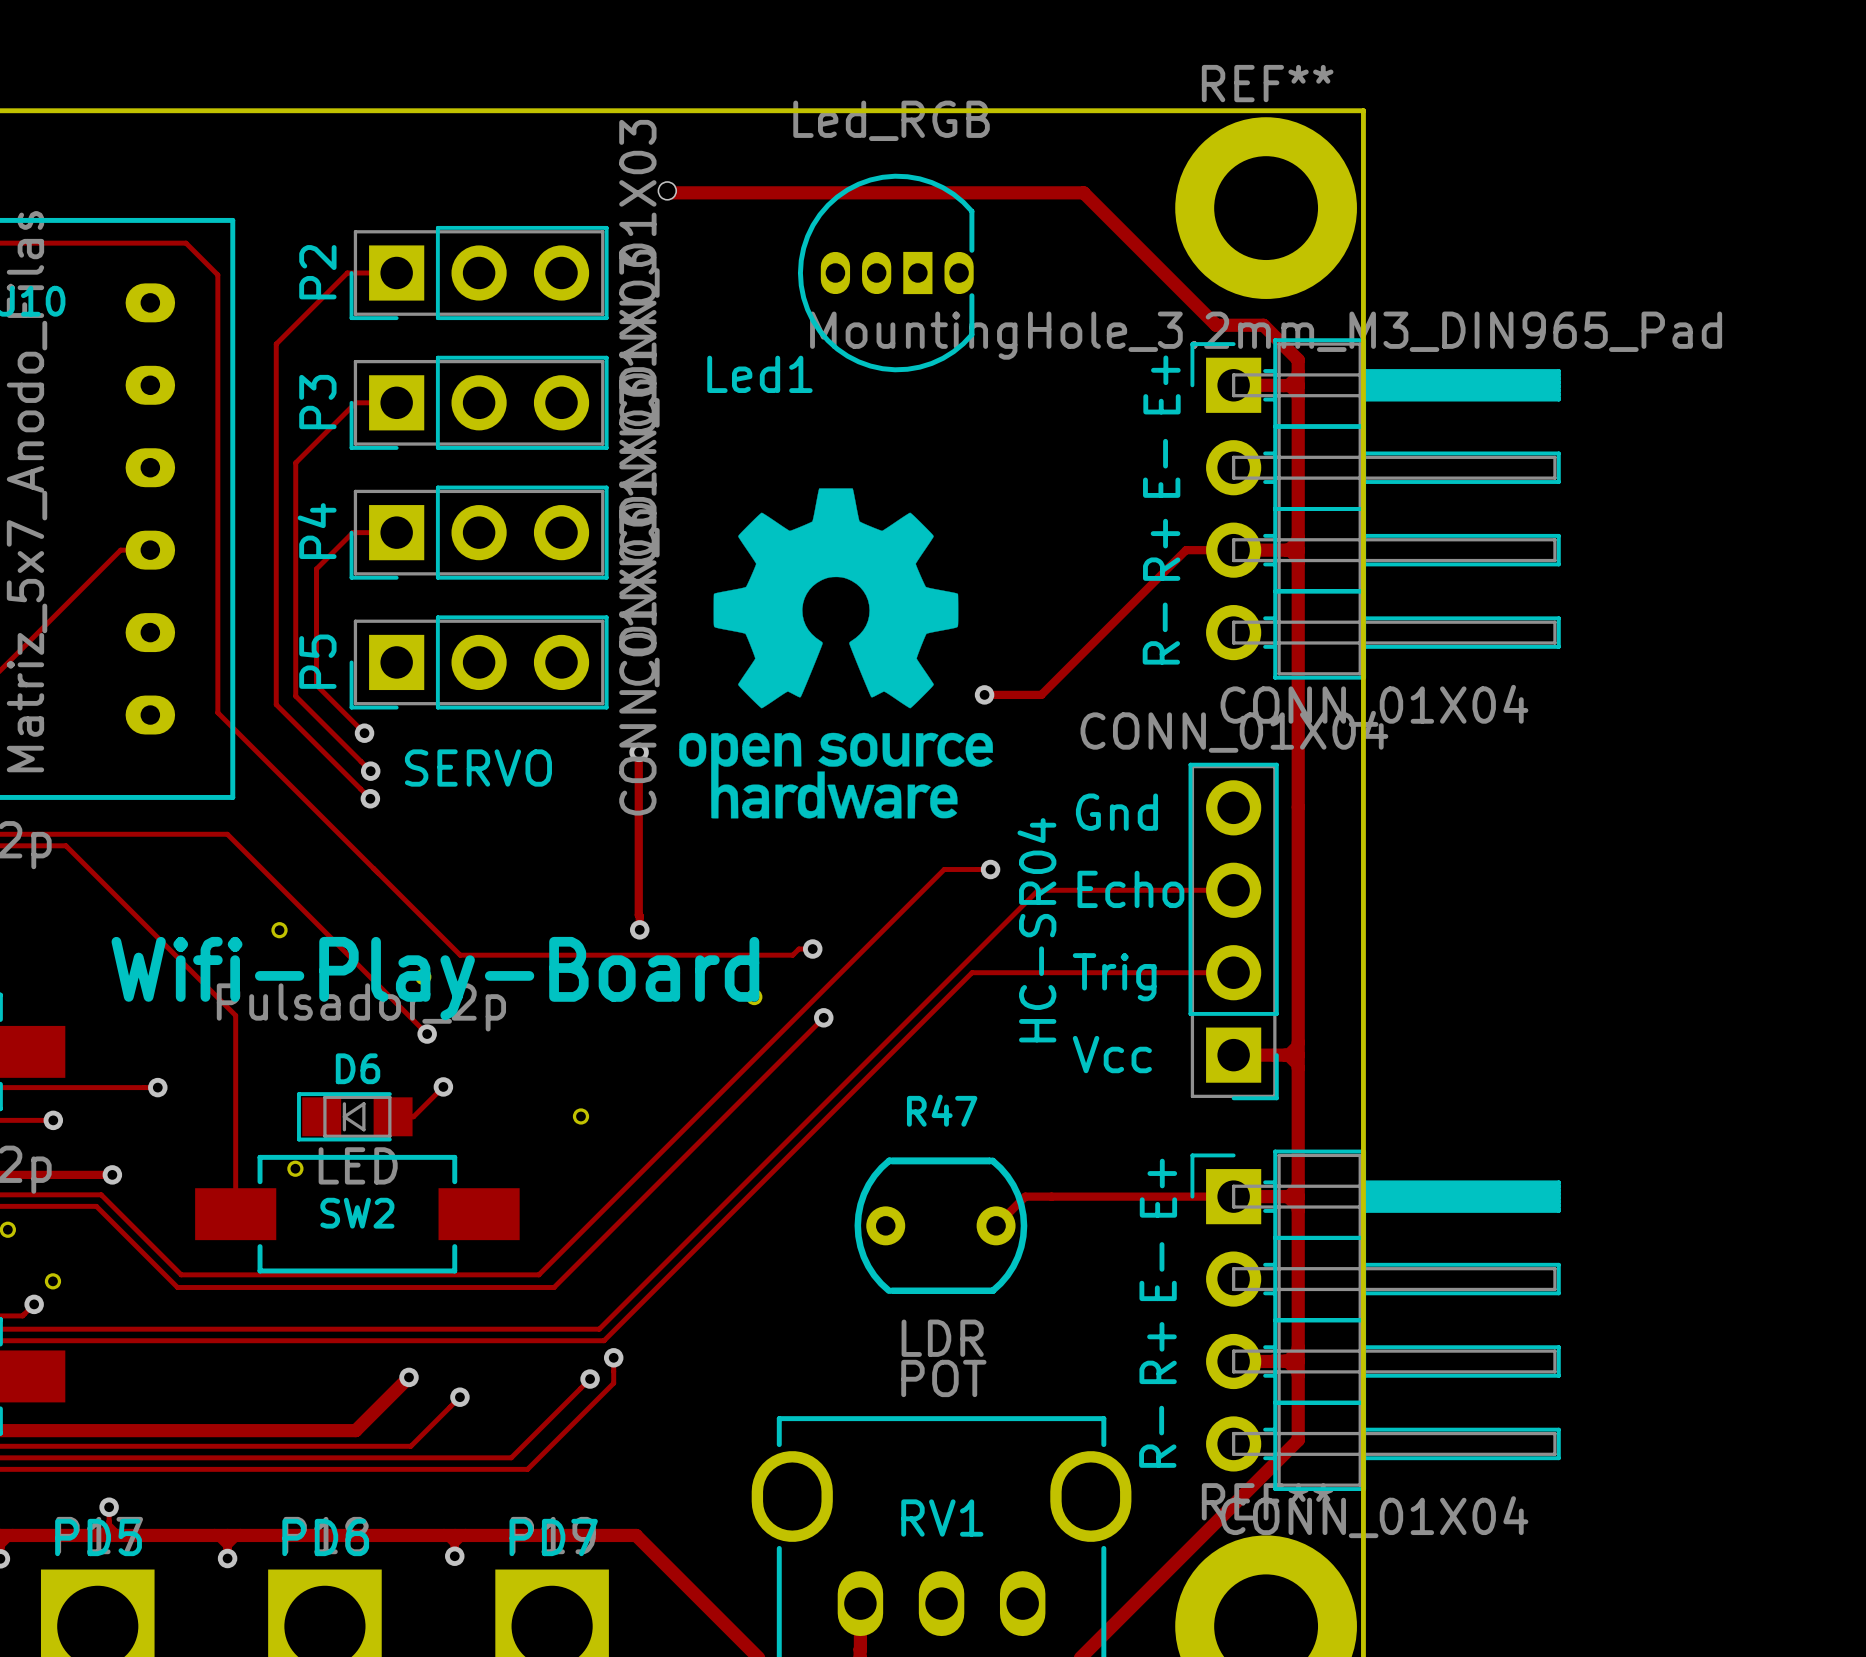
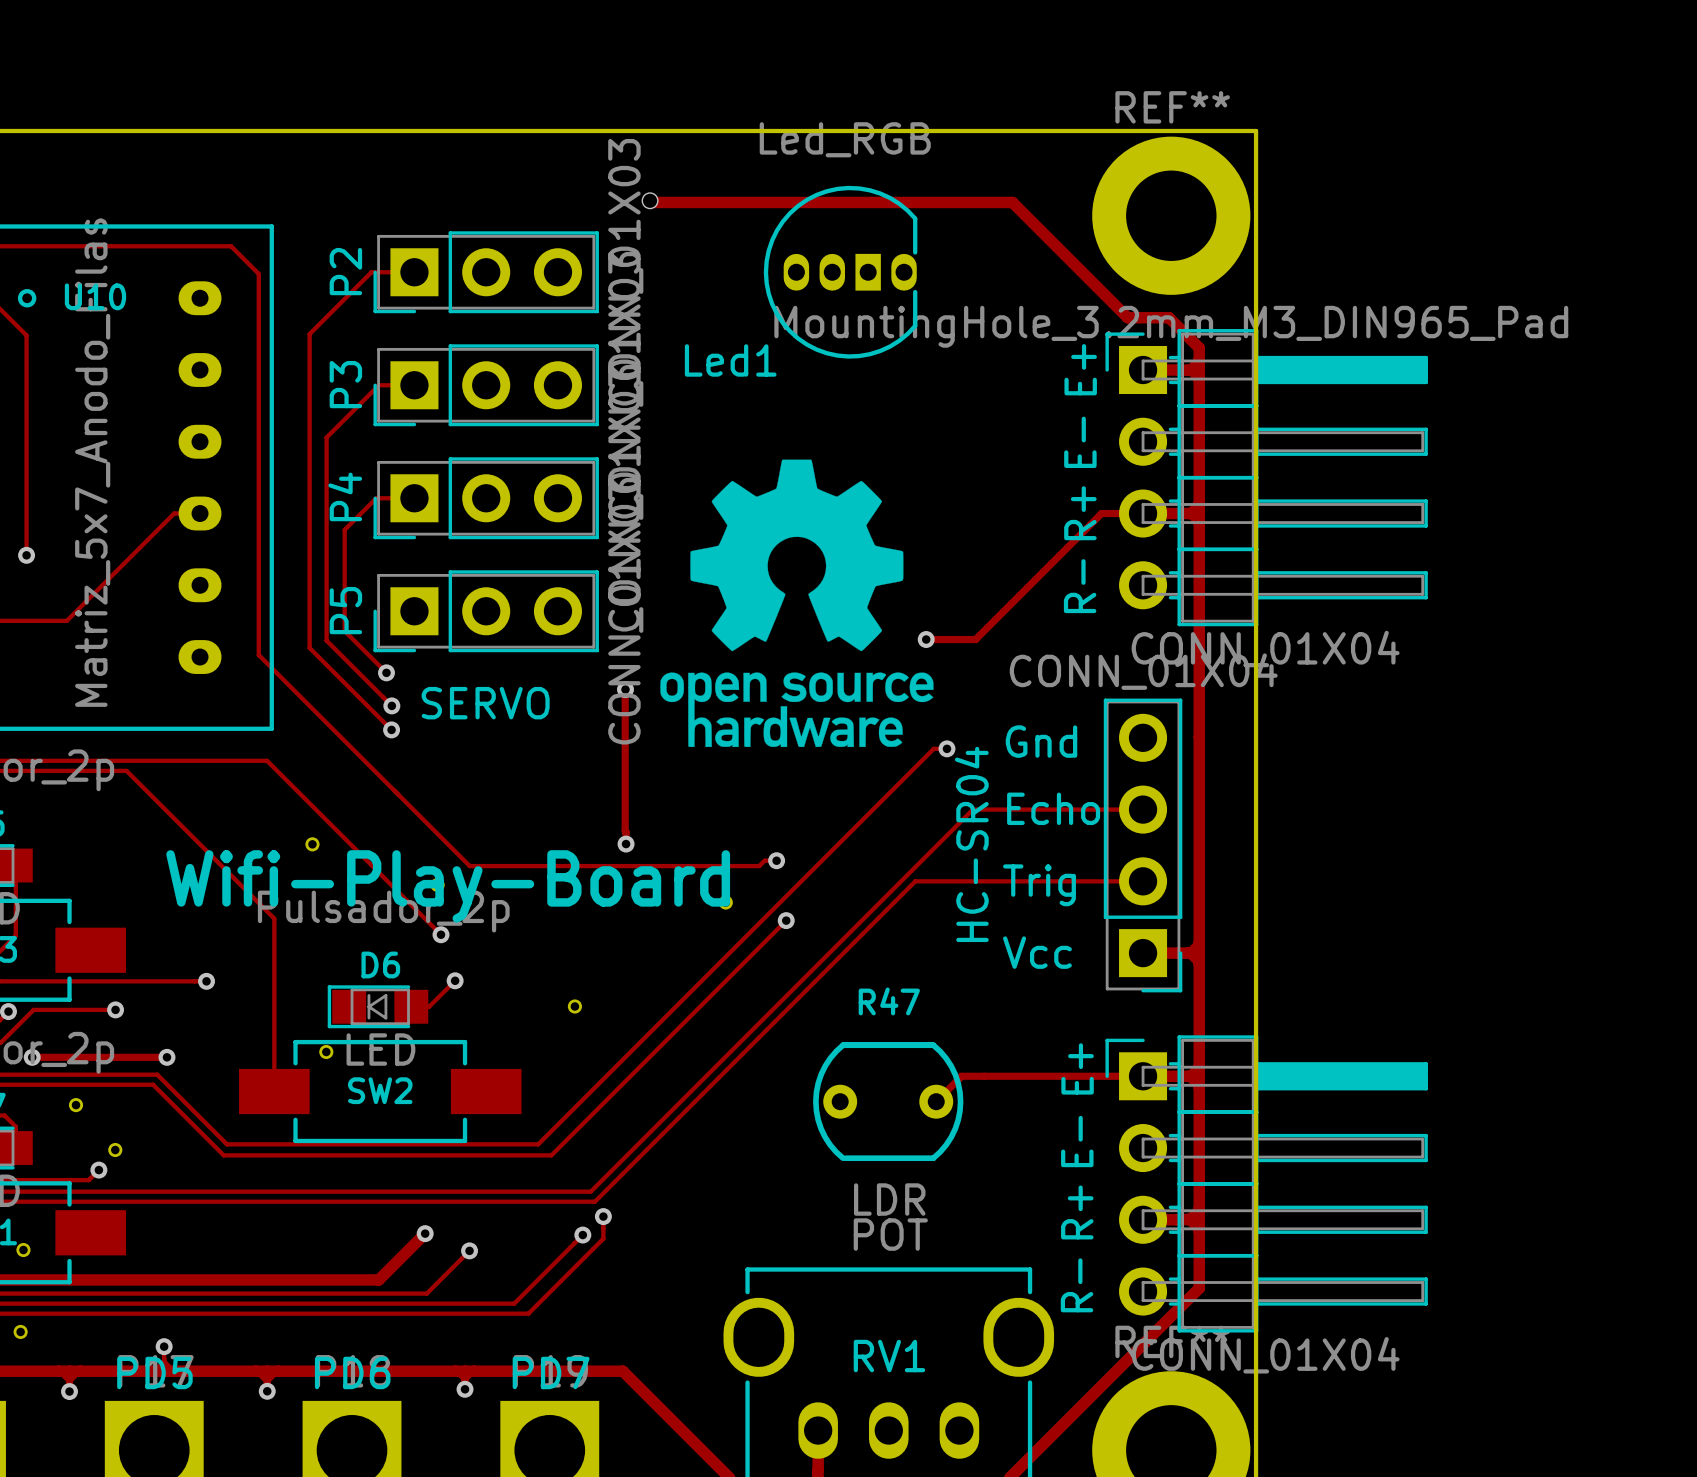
track: (944, 869) (990, 869) -> (891, 791) (933, 748) (946, 748)
via position: (990, 869) -> (946, 748)

